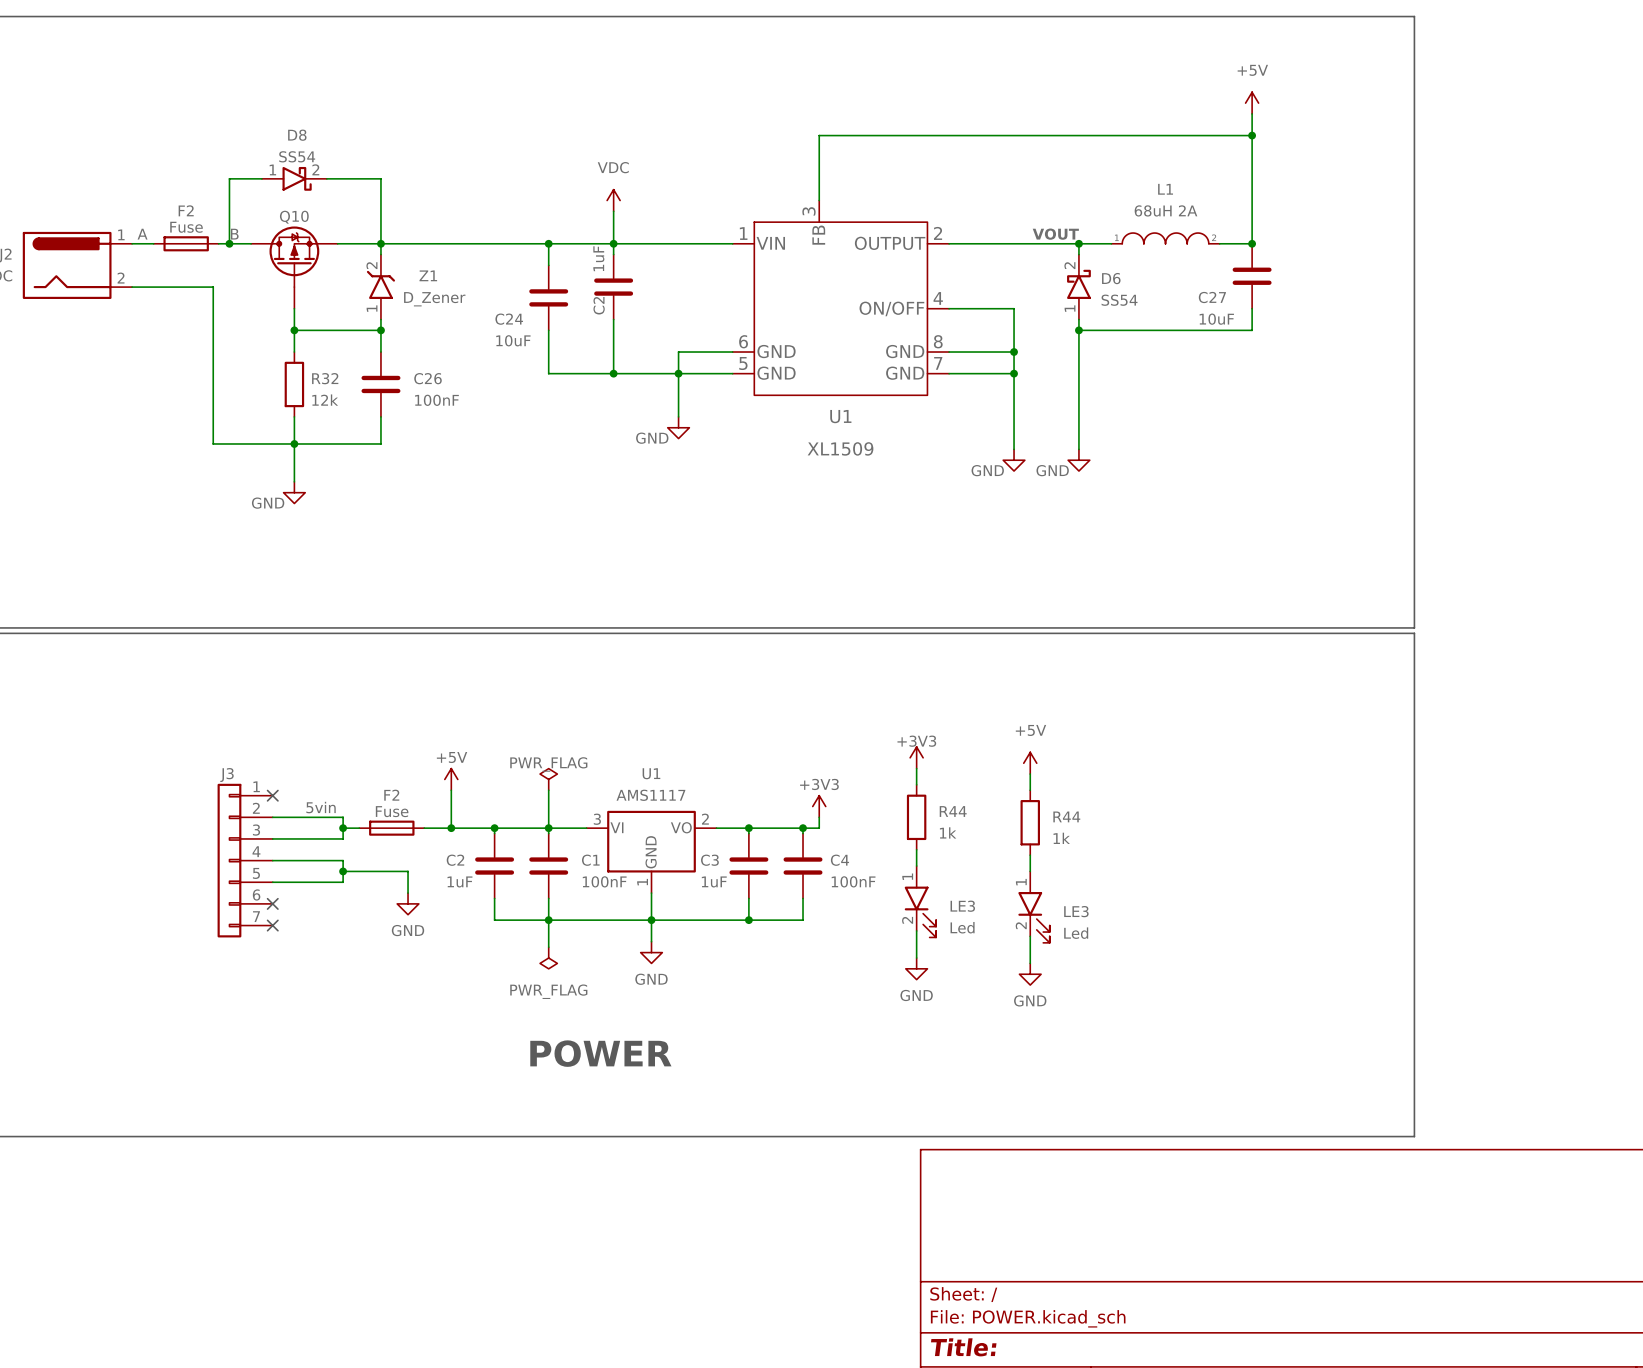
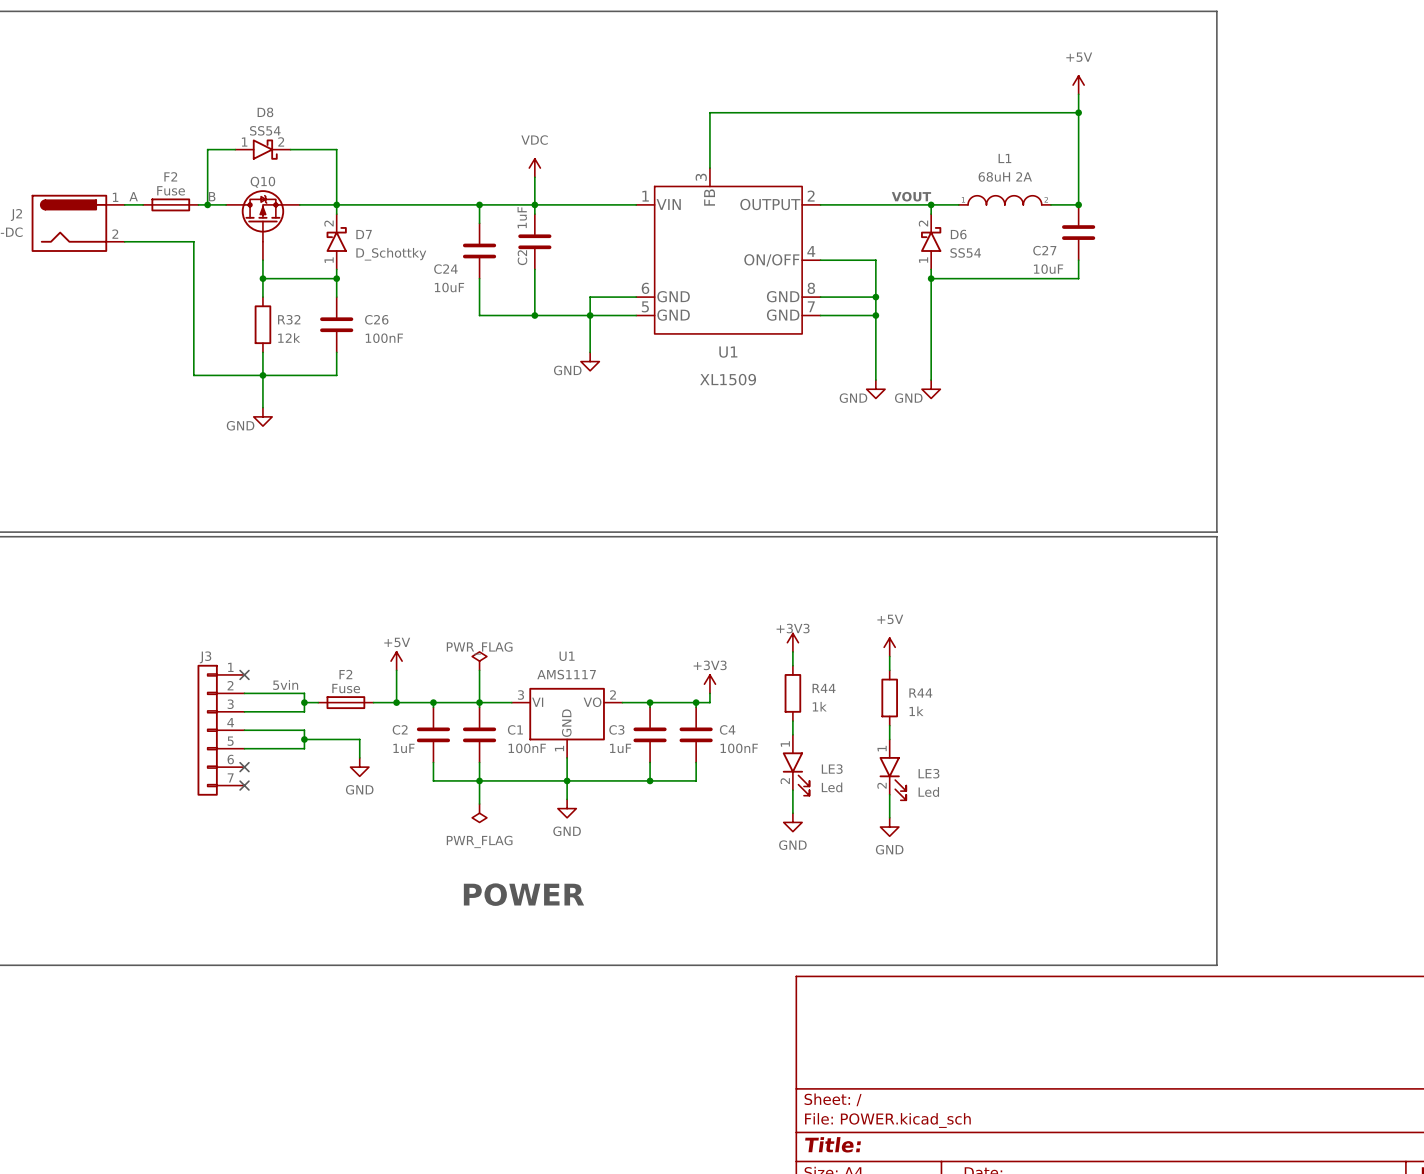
Z1: D_Zener (380, 287) -> none
D7: none -> D_Schottky (336, 241)

